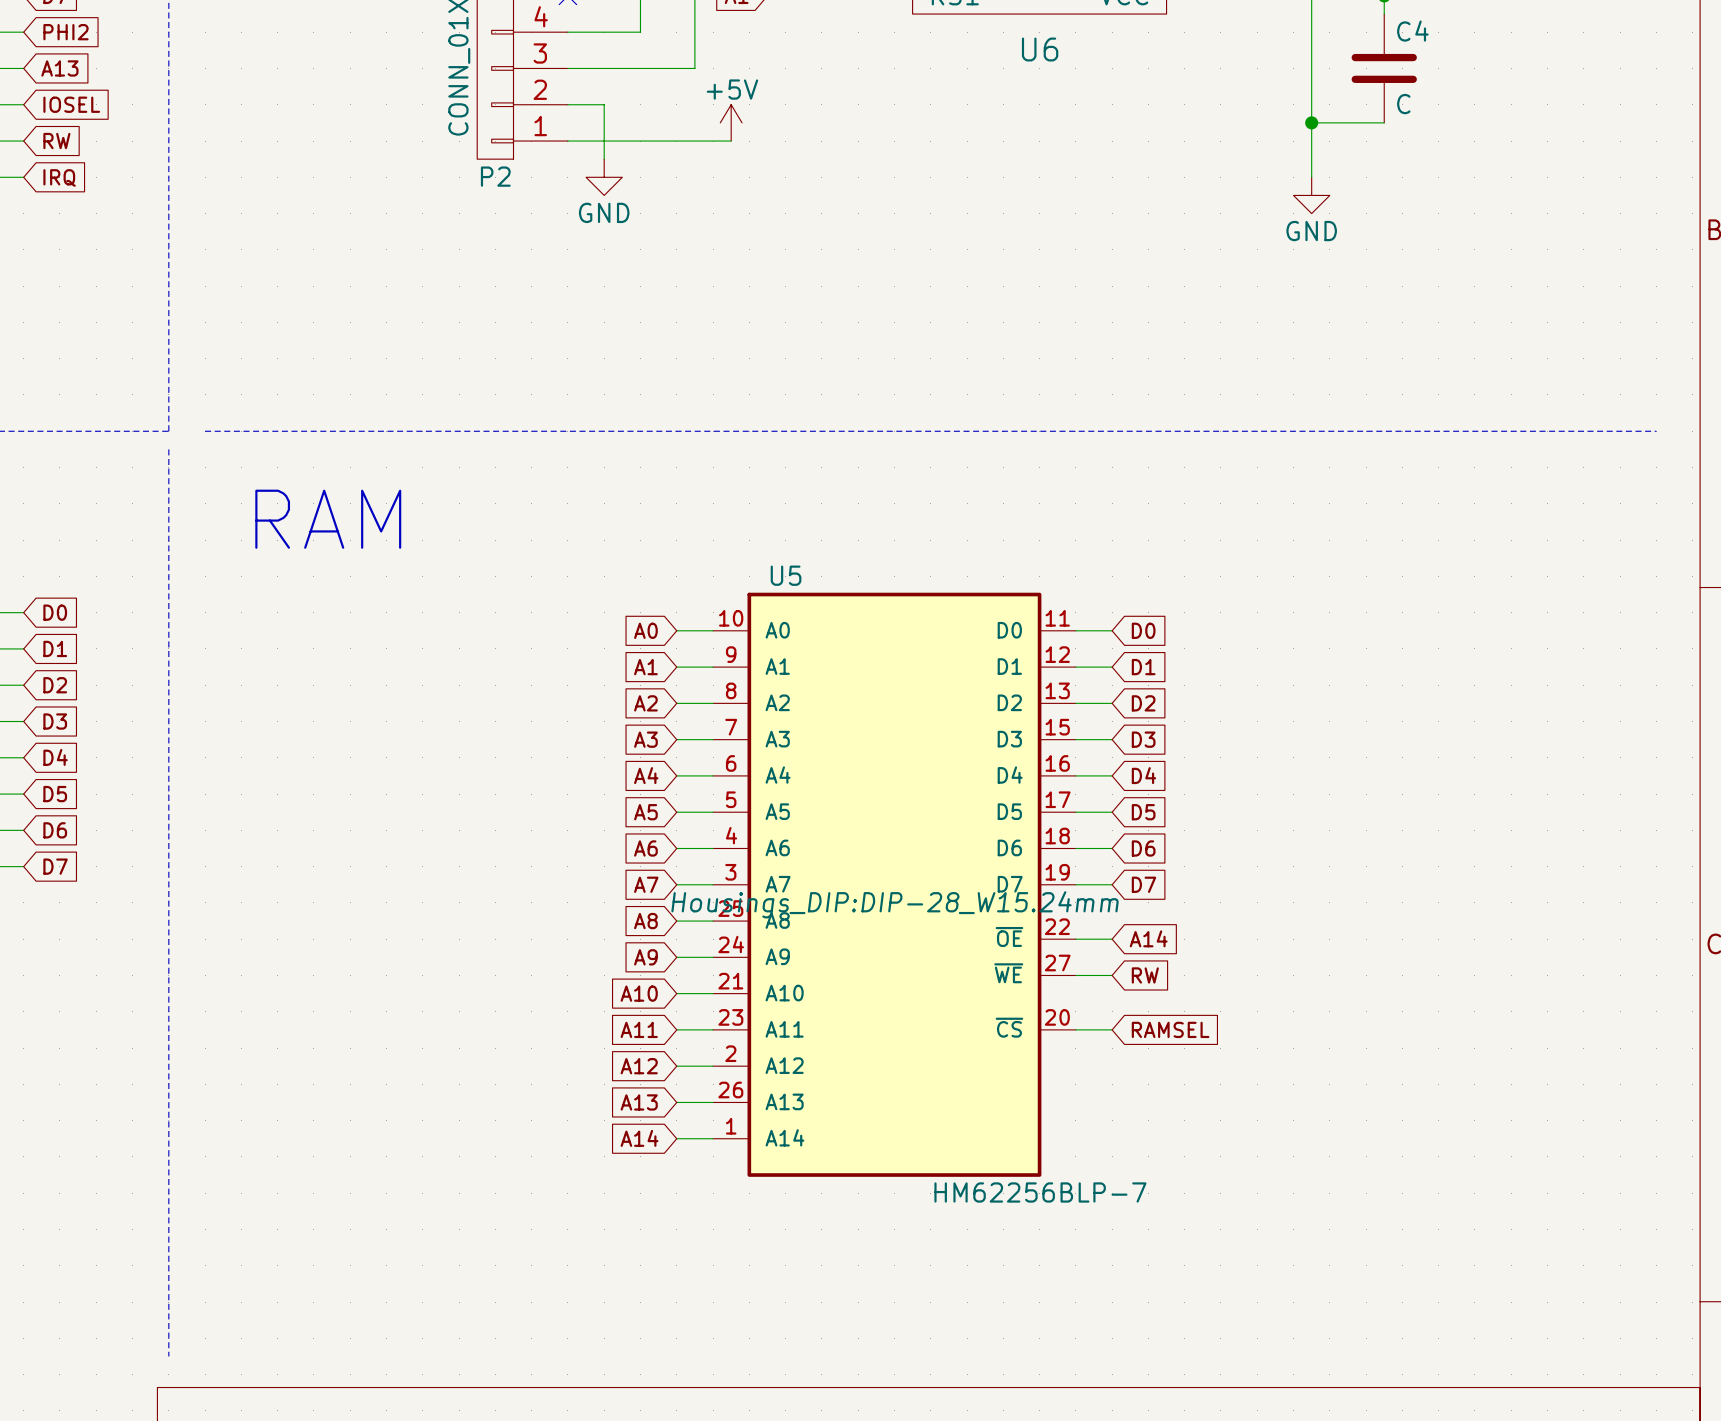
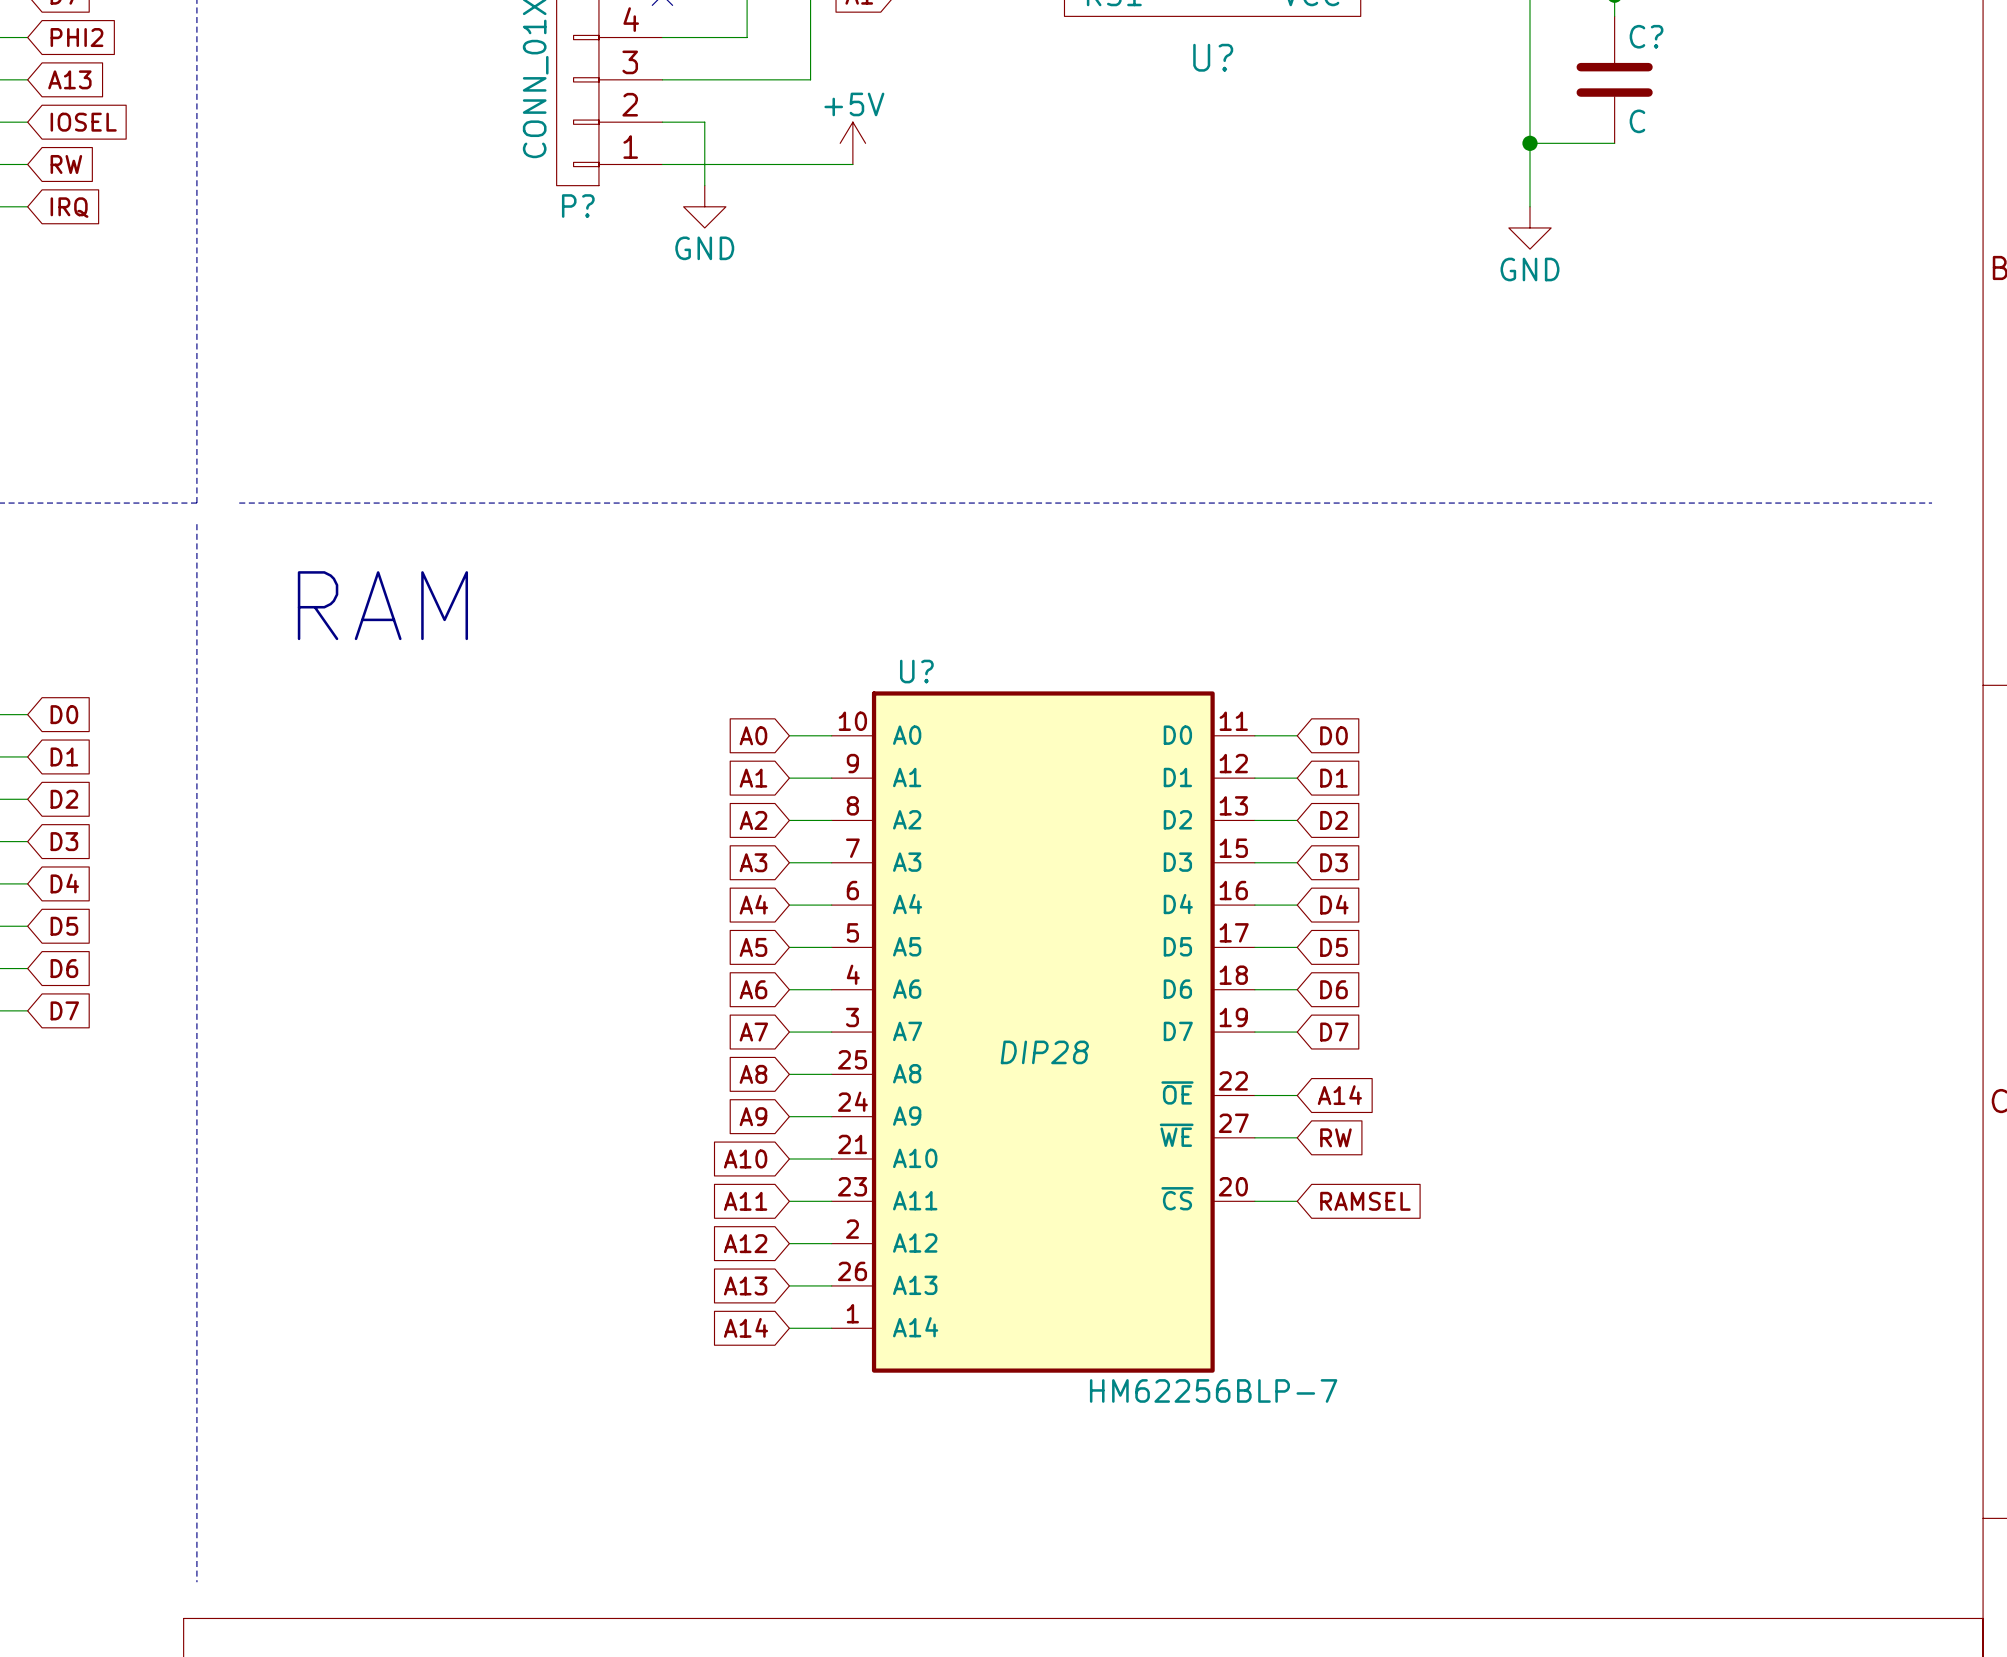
C4 name: C4 (1412, 31) -> C? (1646, 36)
U6 name: U6 (1040, 49) -> U? (1213, 57)
P2 name: P2 (495, 176) -> P? (578, 206)
U5 name: U5 (786, 575) -> U? (916, 671)
U5 text: Housings_DIP:DIP-28_W15.24mm (895, 904) -> DIP28 (1044, 1052)

